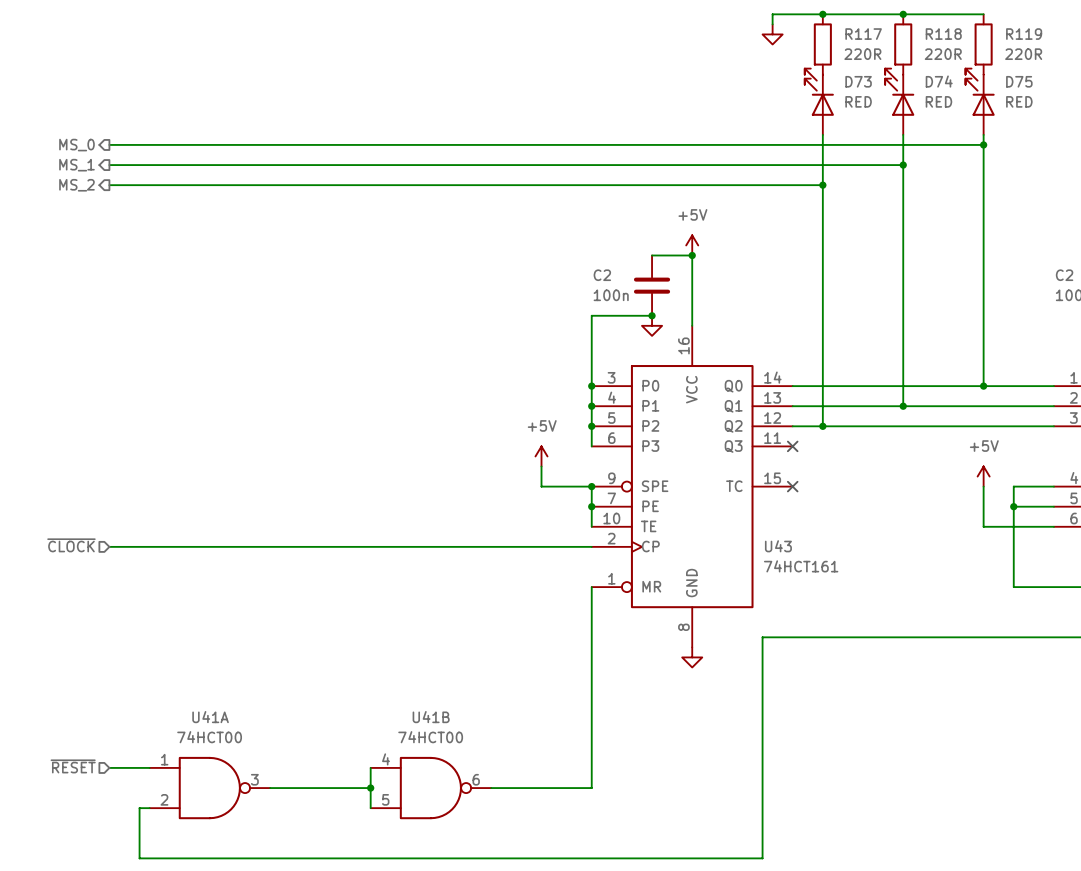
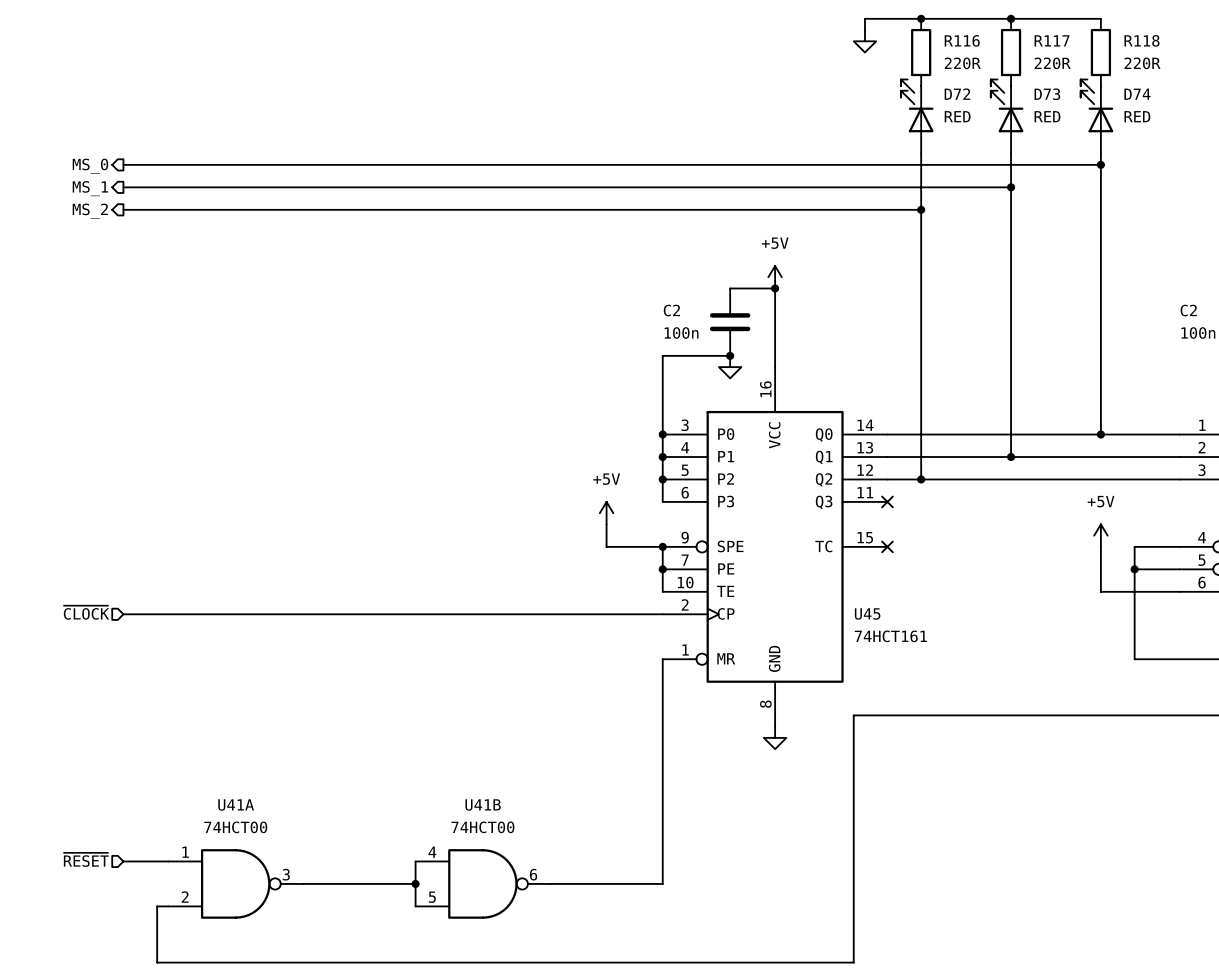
R117 name: R117 (863, 34) -> R116 (962, 40)
R118 name: R118 (943, 34) -> R117 (1052, 40)
R119 name: R119 (1024, 34) -> R118 (1142, 40)
D73 name: D73 (858, 81) -> D72 (957, 94)
D74 name: D74 (939, 81) -> D73 (1047, 94)
D75 name: D75 (1019, 81) -> D74 (1137, 94)
U43 name: U43 (778, 546) -> U45 (867, 613)

